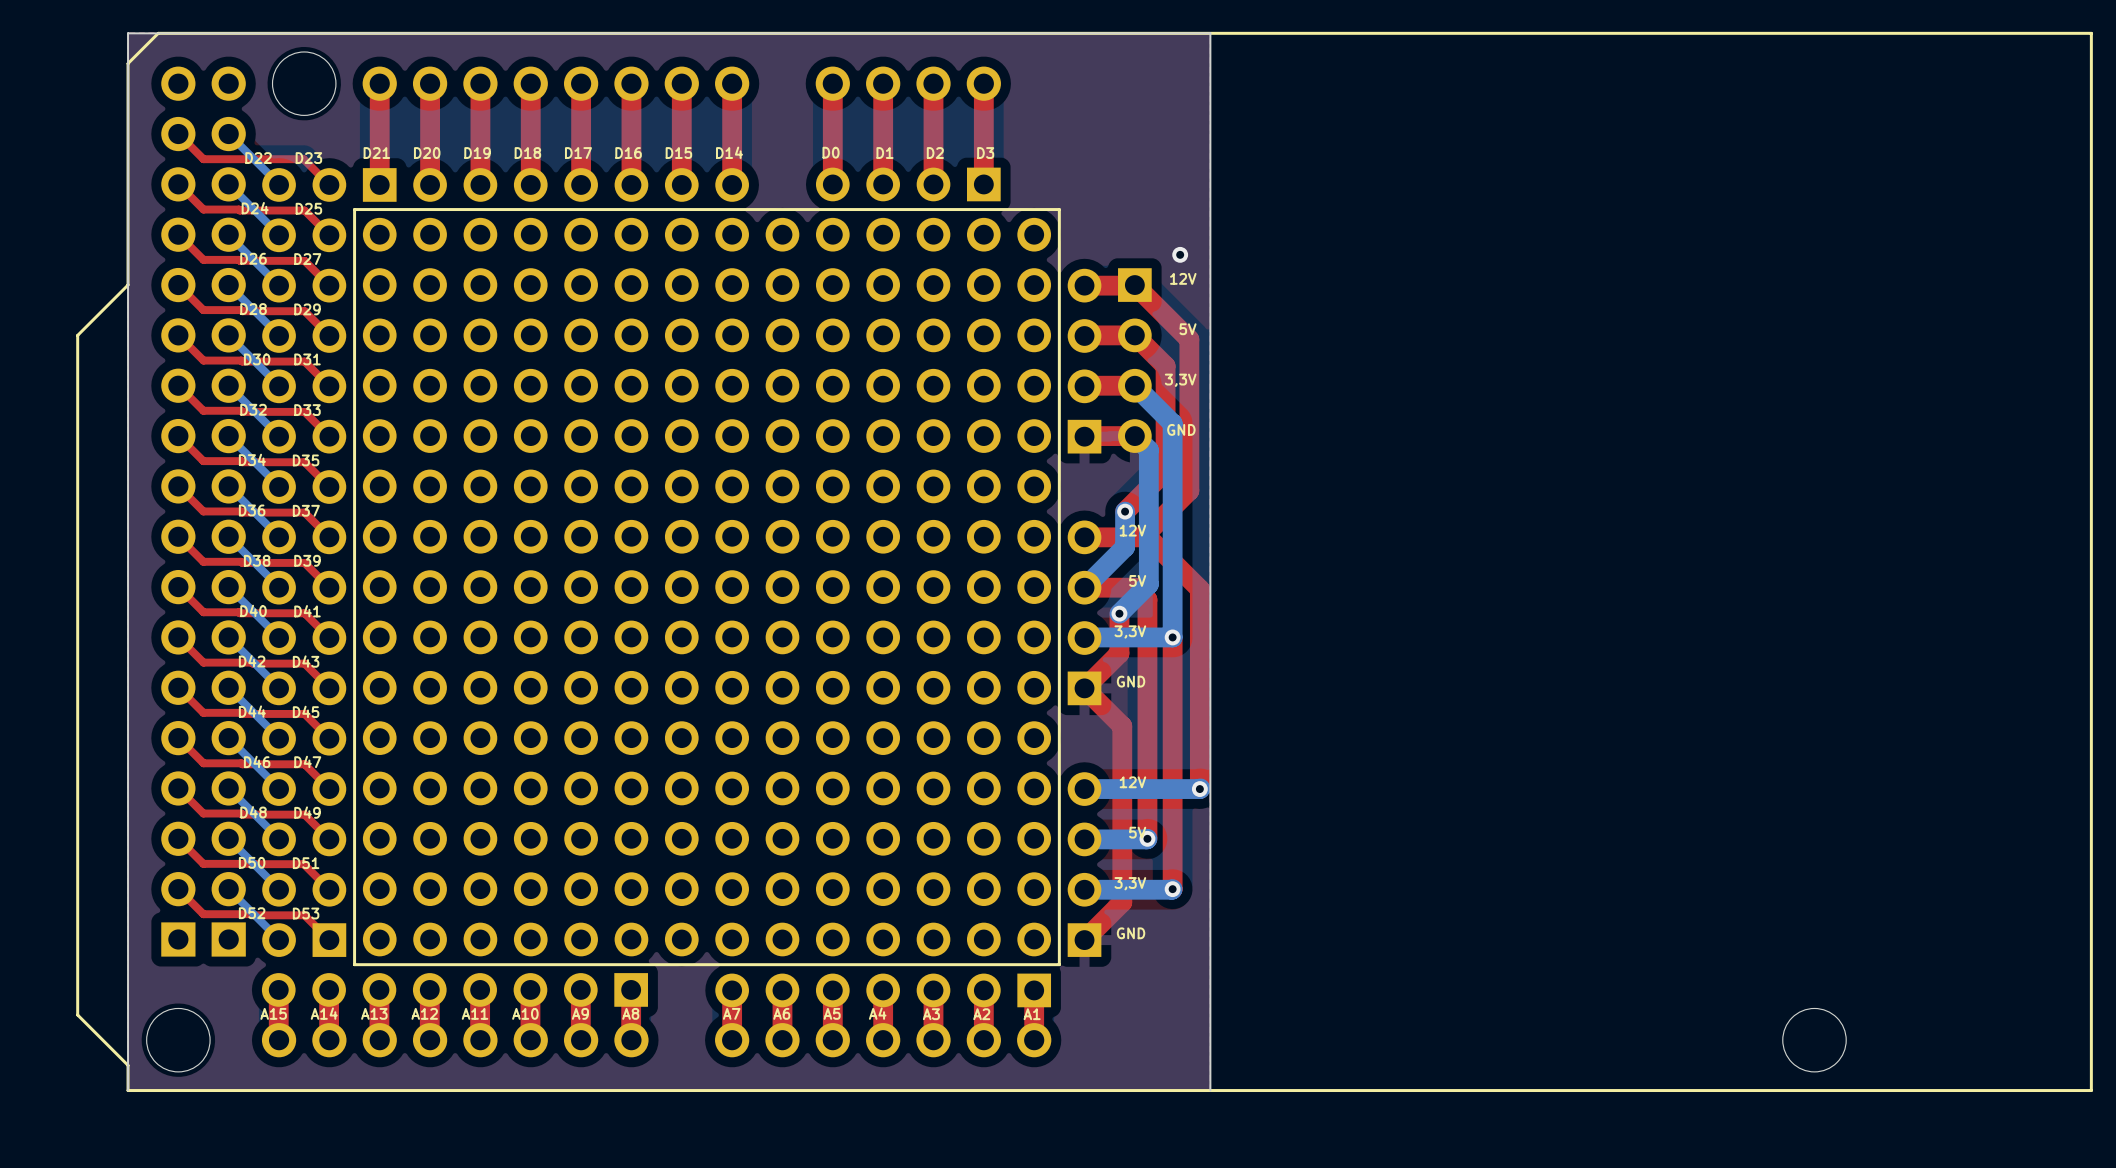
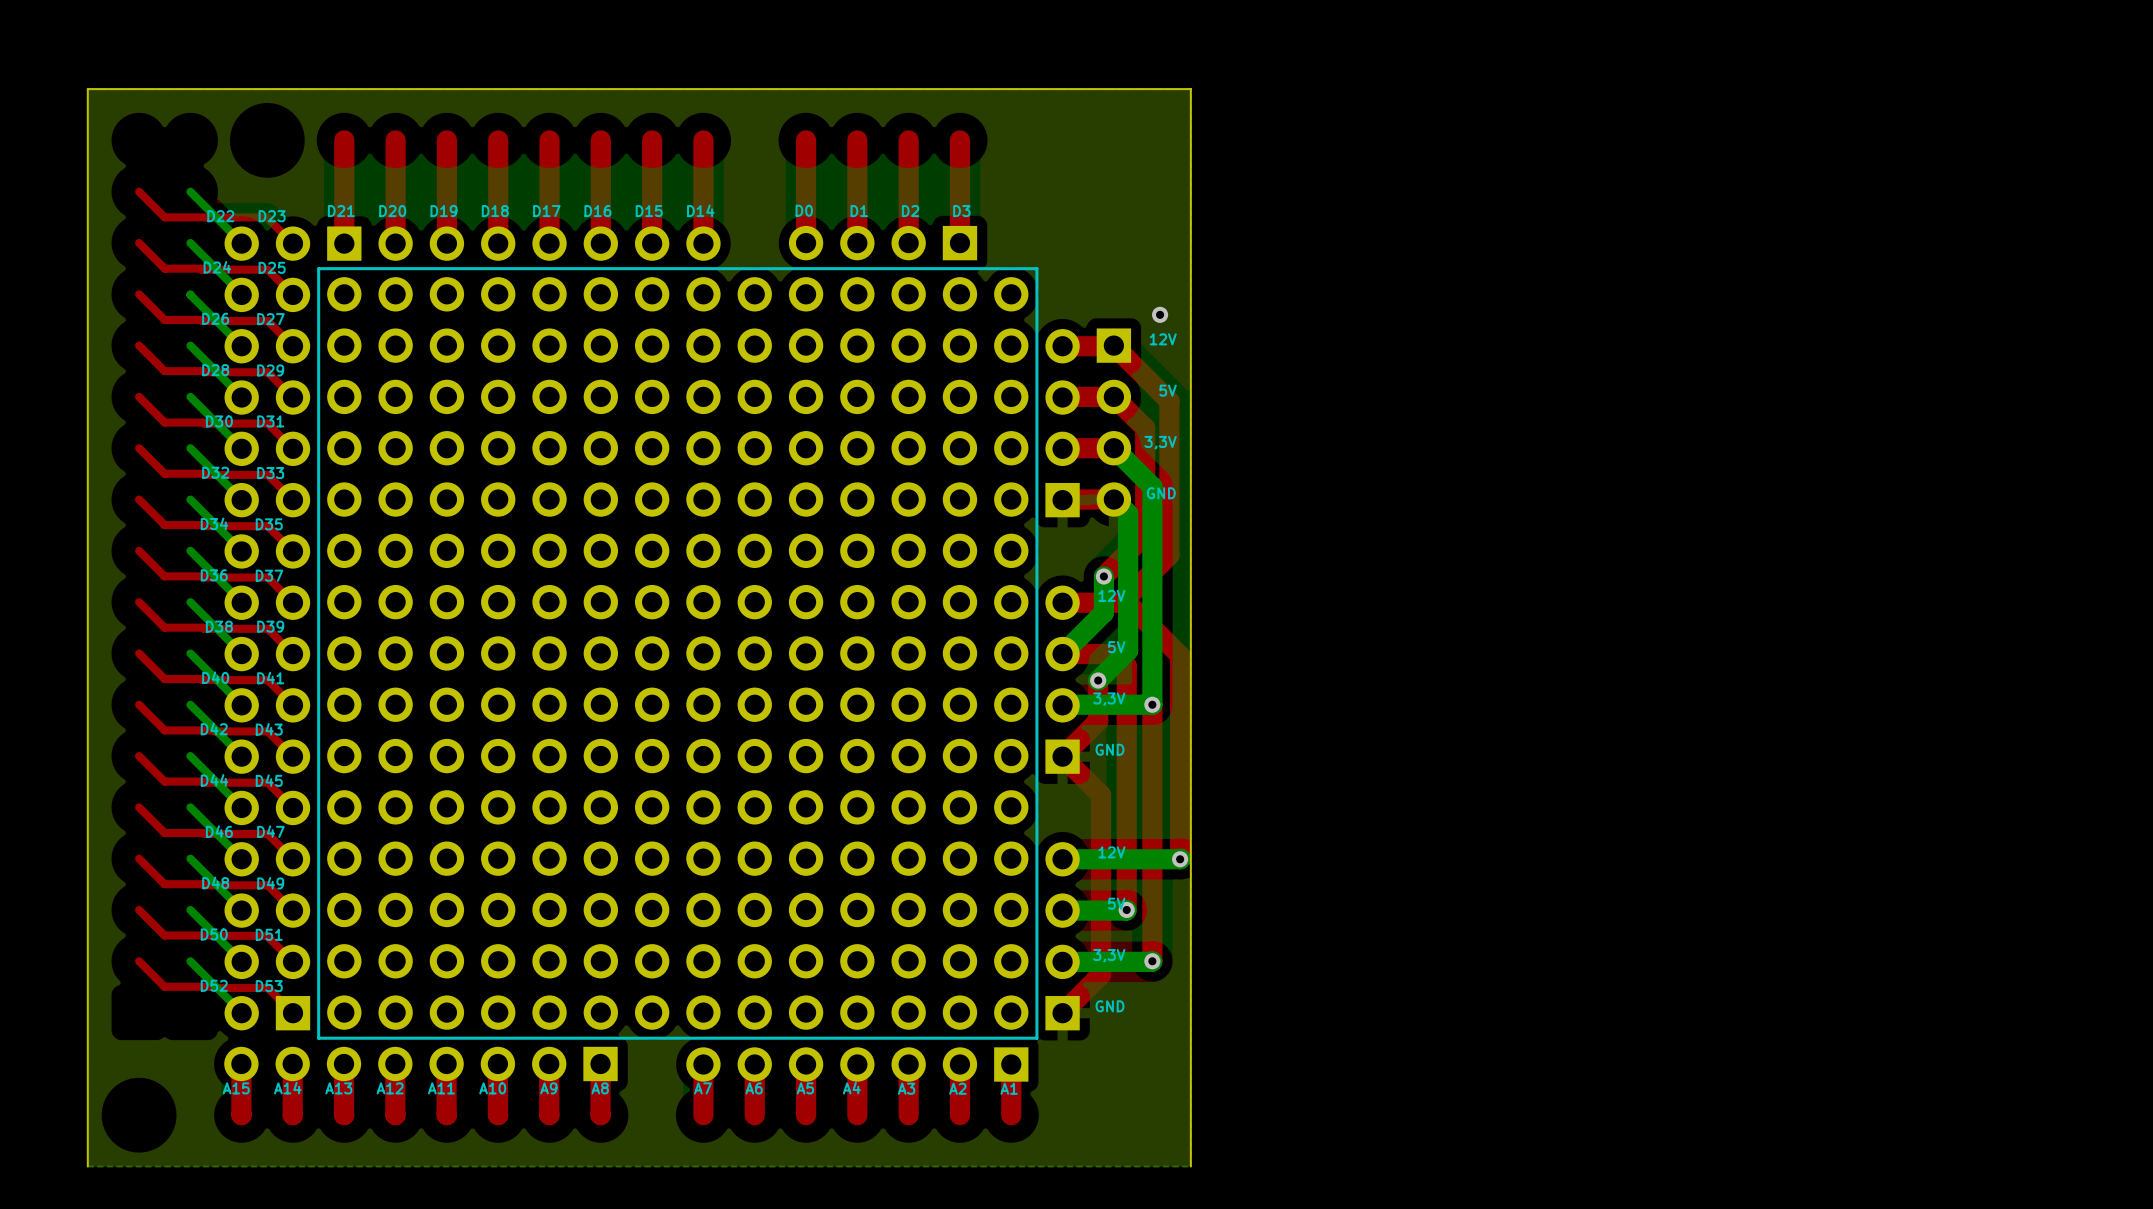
part: (1084, 561) -> none

